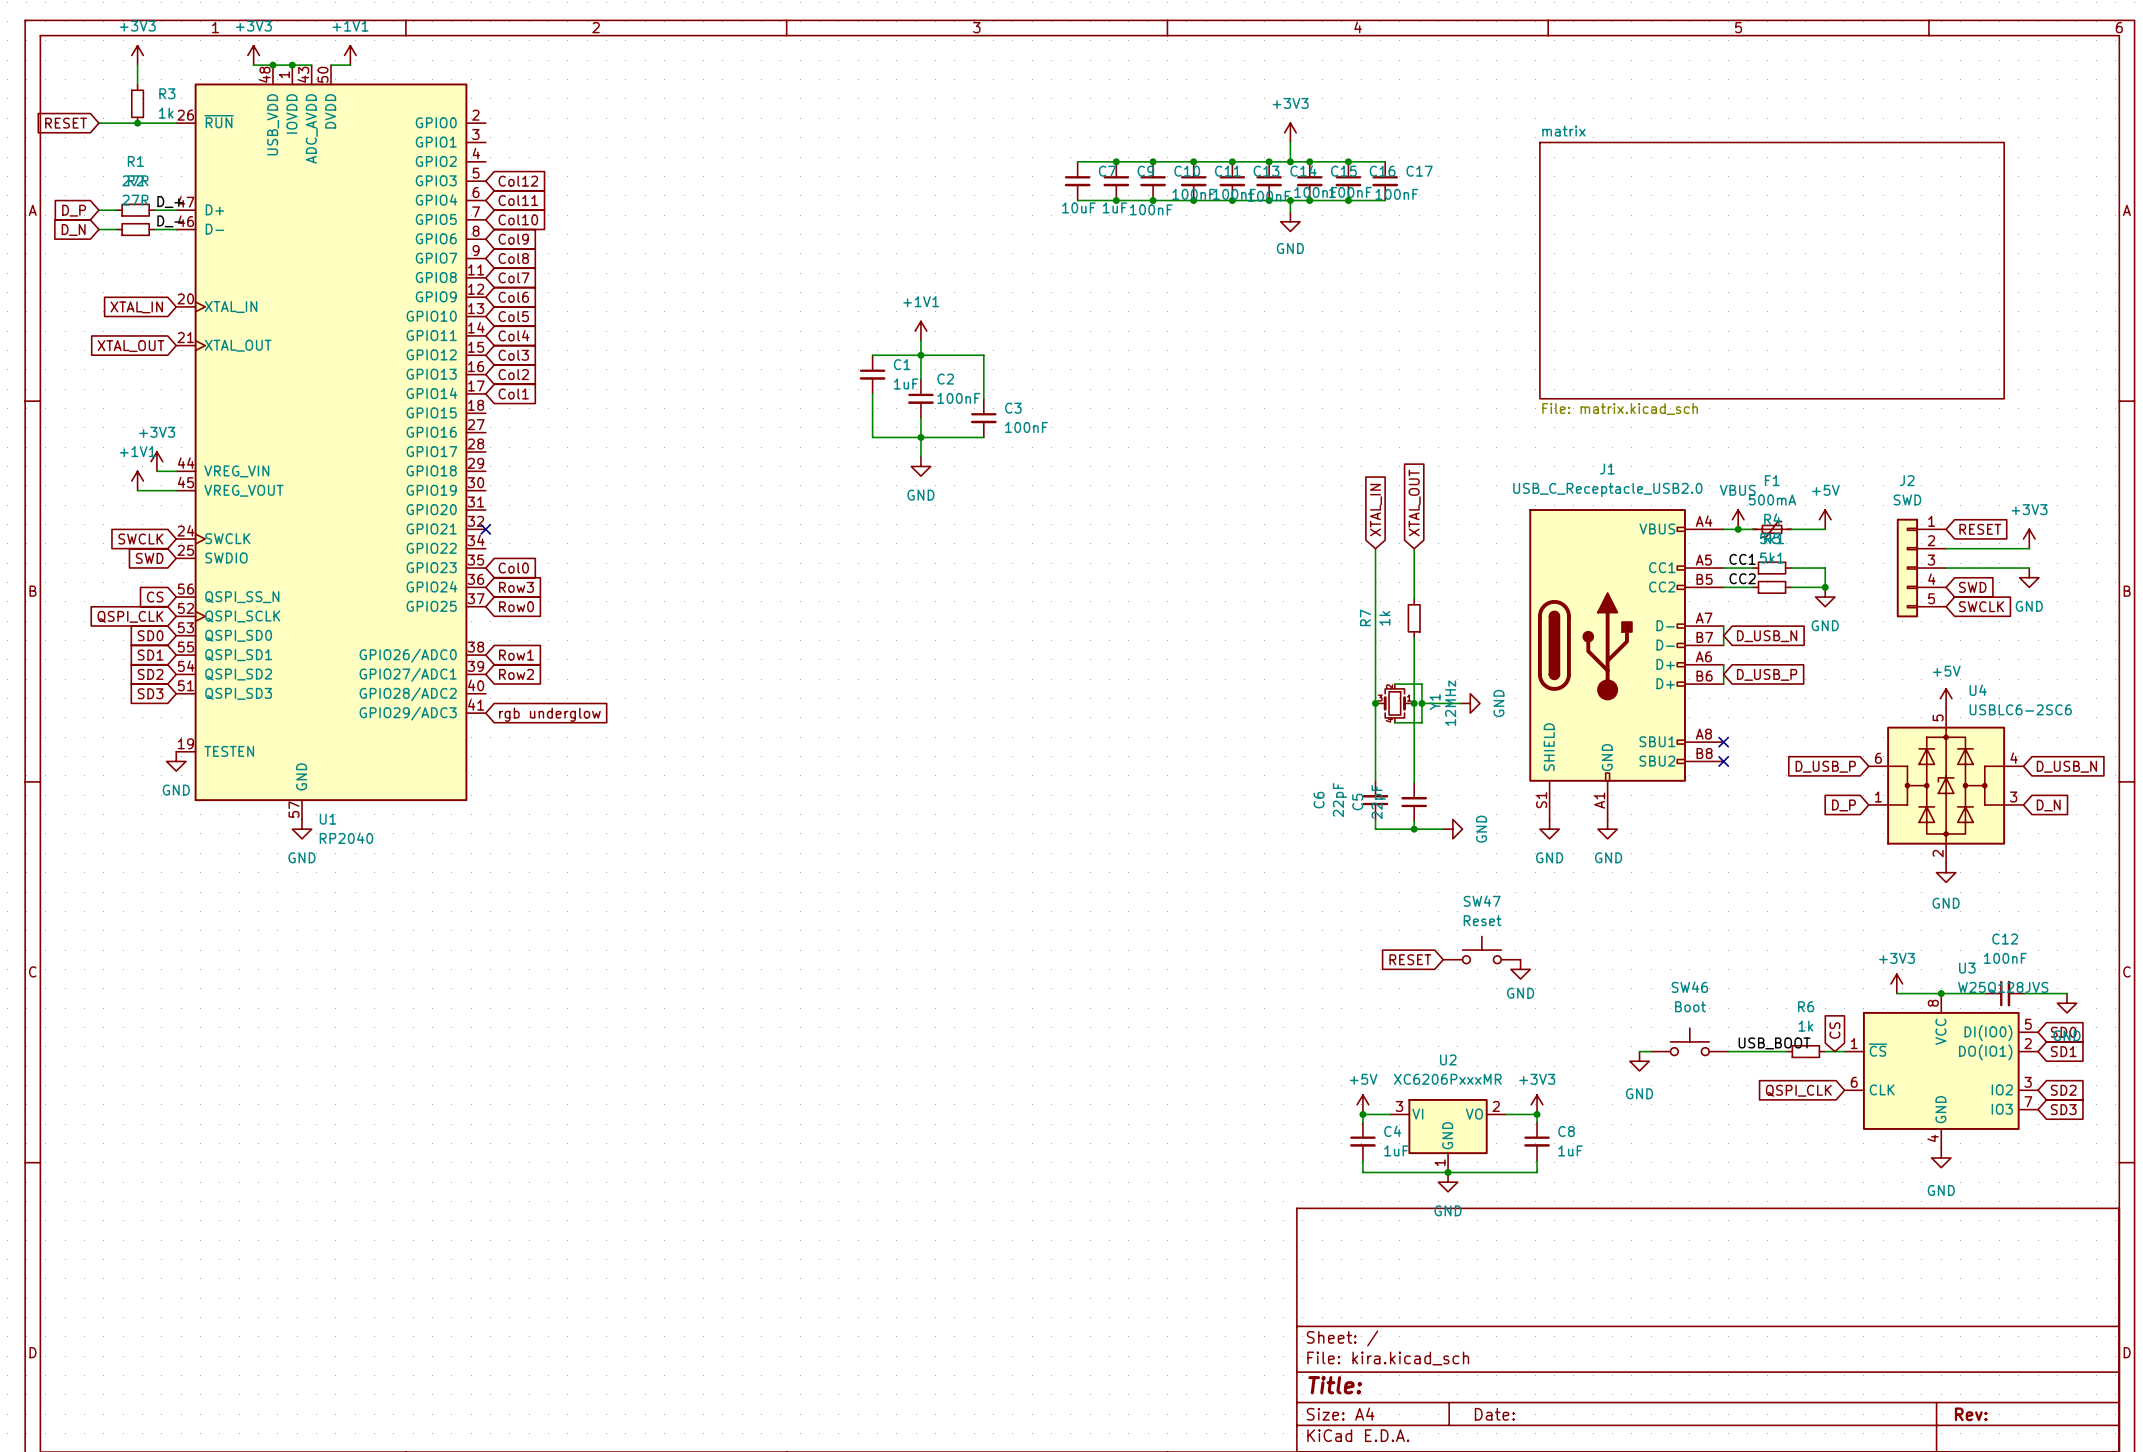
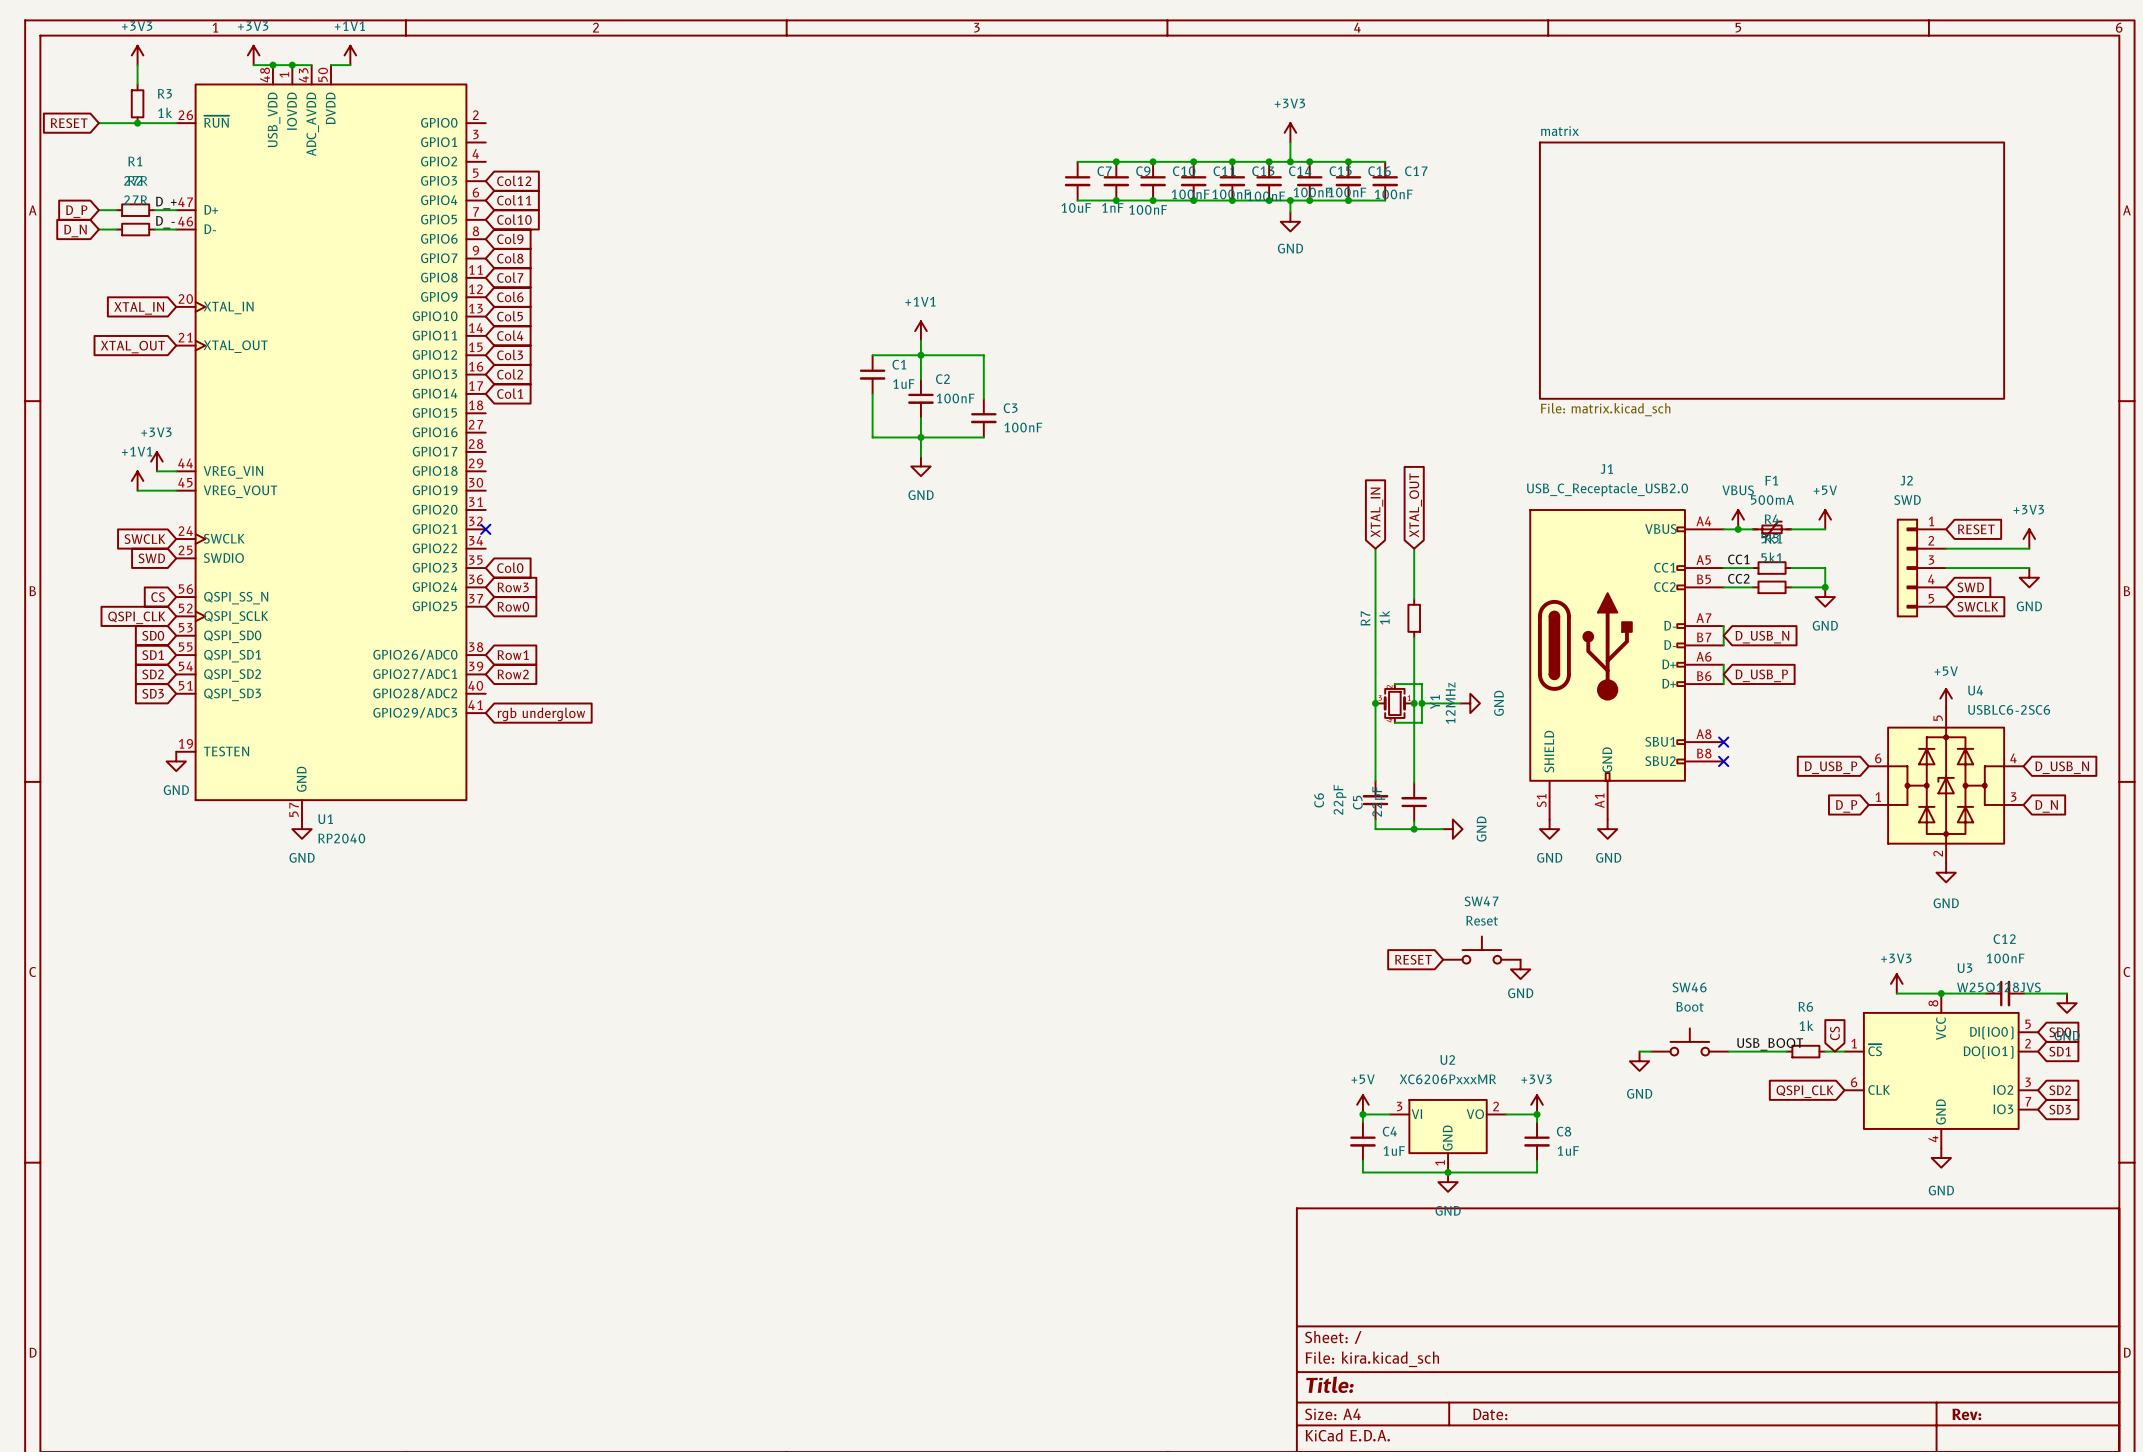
C9 value: 1uF (1114, 207) -> 1nF (1112, 207)

